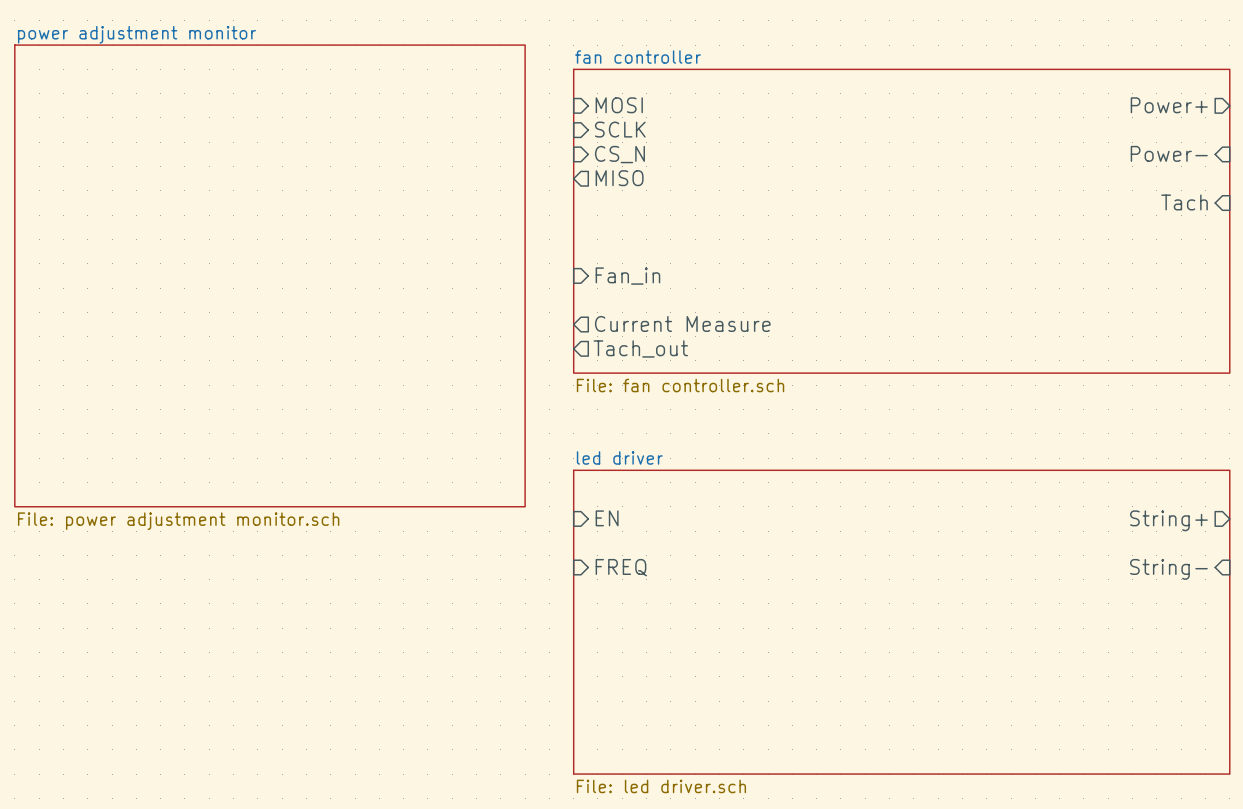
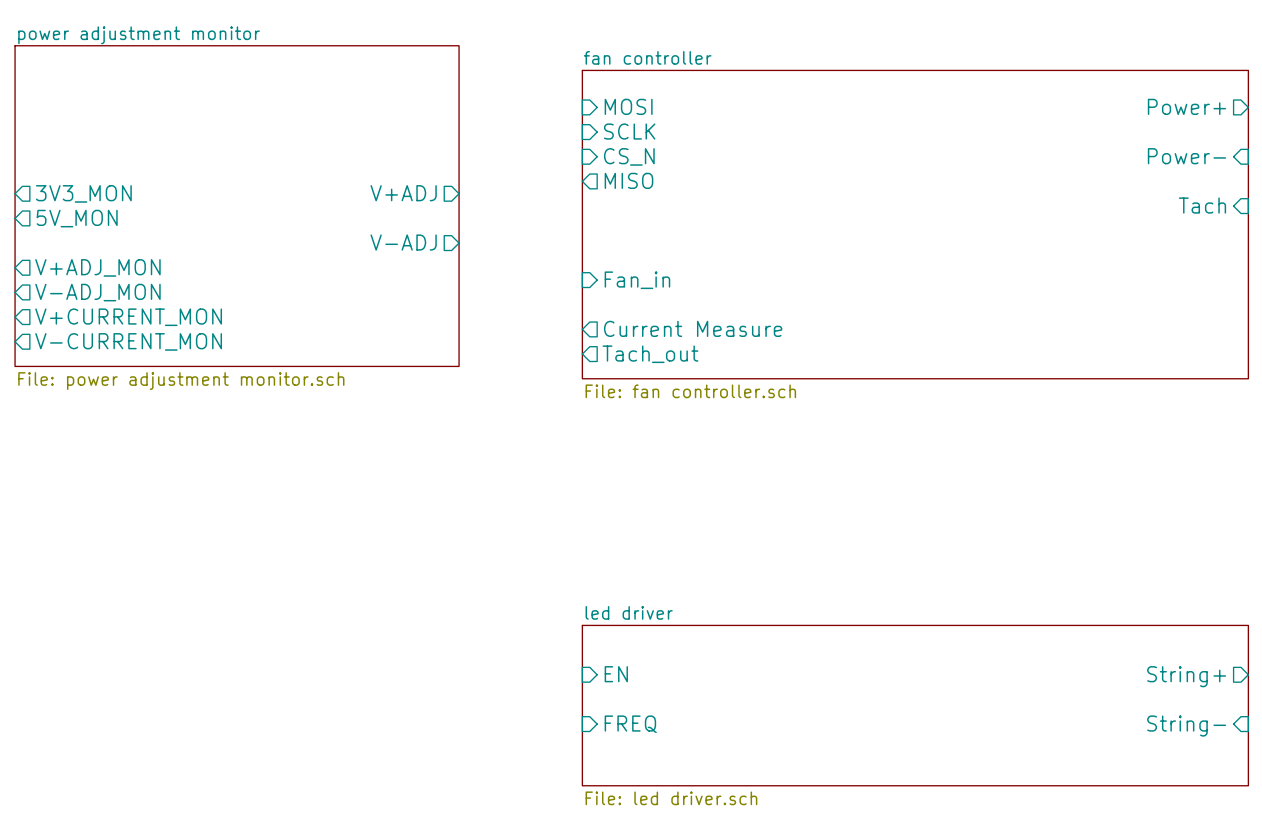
sheet pin: none -> V+ADJ (403, 193)
sheet pin: none -> 3V3_MON (83, 193)
sheet power adjustment monitor: none -> File: power adjustment monitor.sch (237, 206)
sheet pin: none -> 5V_MON (77, 218)
sheet pin: none -> V-ADJ (403, 242)
sheet pin: none -> V+ADJ_MON (97, 267)
sheet power adjustment monitor: File: power adjustment monitor.sch (269, 275) -> none
sheet pin: none -> V-ADJ_MON (97, 292)
sheet pin: none -> V+CURRENT_MON (128, 317)
sheet pin: none -> V-CURRENT_MON (128, 341)
sheet pin position: EN (607, 518) -> EN (616, 674)
sheet pin position: String+ (1168, 520) -> String+ (1186, 676)
sheet pin position: FREQ (621, 567) -> FREQ (630, 724)
sheet pin position: String- (1168, 569) -> String- (1186, 726)
sheet led driver: File: led driver.sch (901, 622) -> none
sheet led driver: none -> File: led driver.sch (915, 705)

